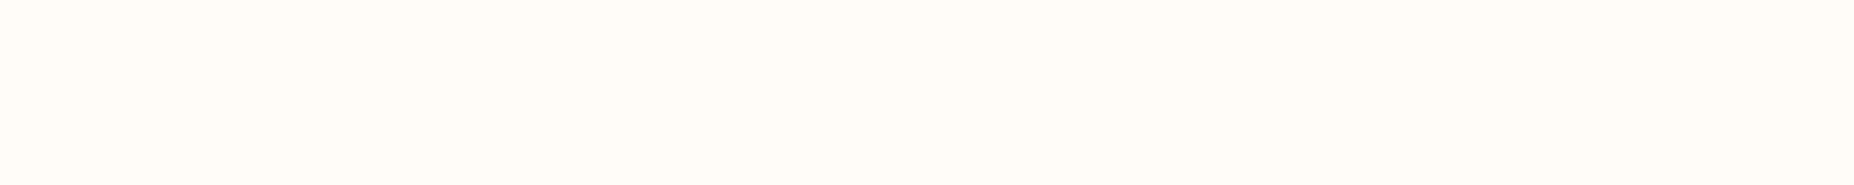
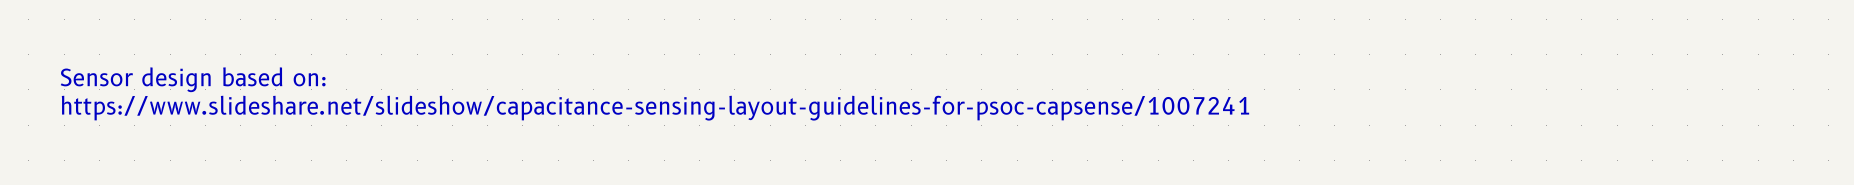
text: none -> Sensor design based on: (193, 79)
text: none -> https://www.slideshare.net/slideshow/capacitance-sensing-layout-guidelines-for-psoc-capsense/1007241 (655, 108)

